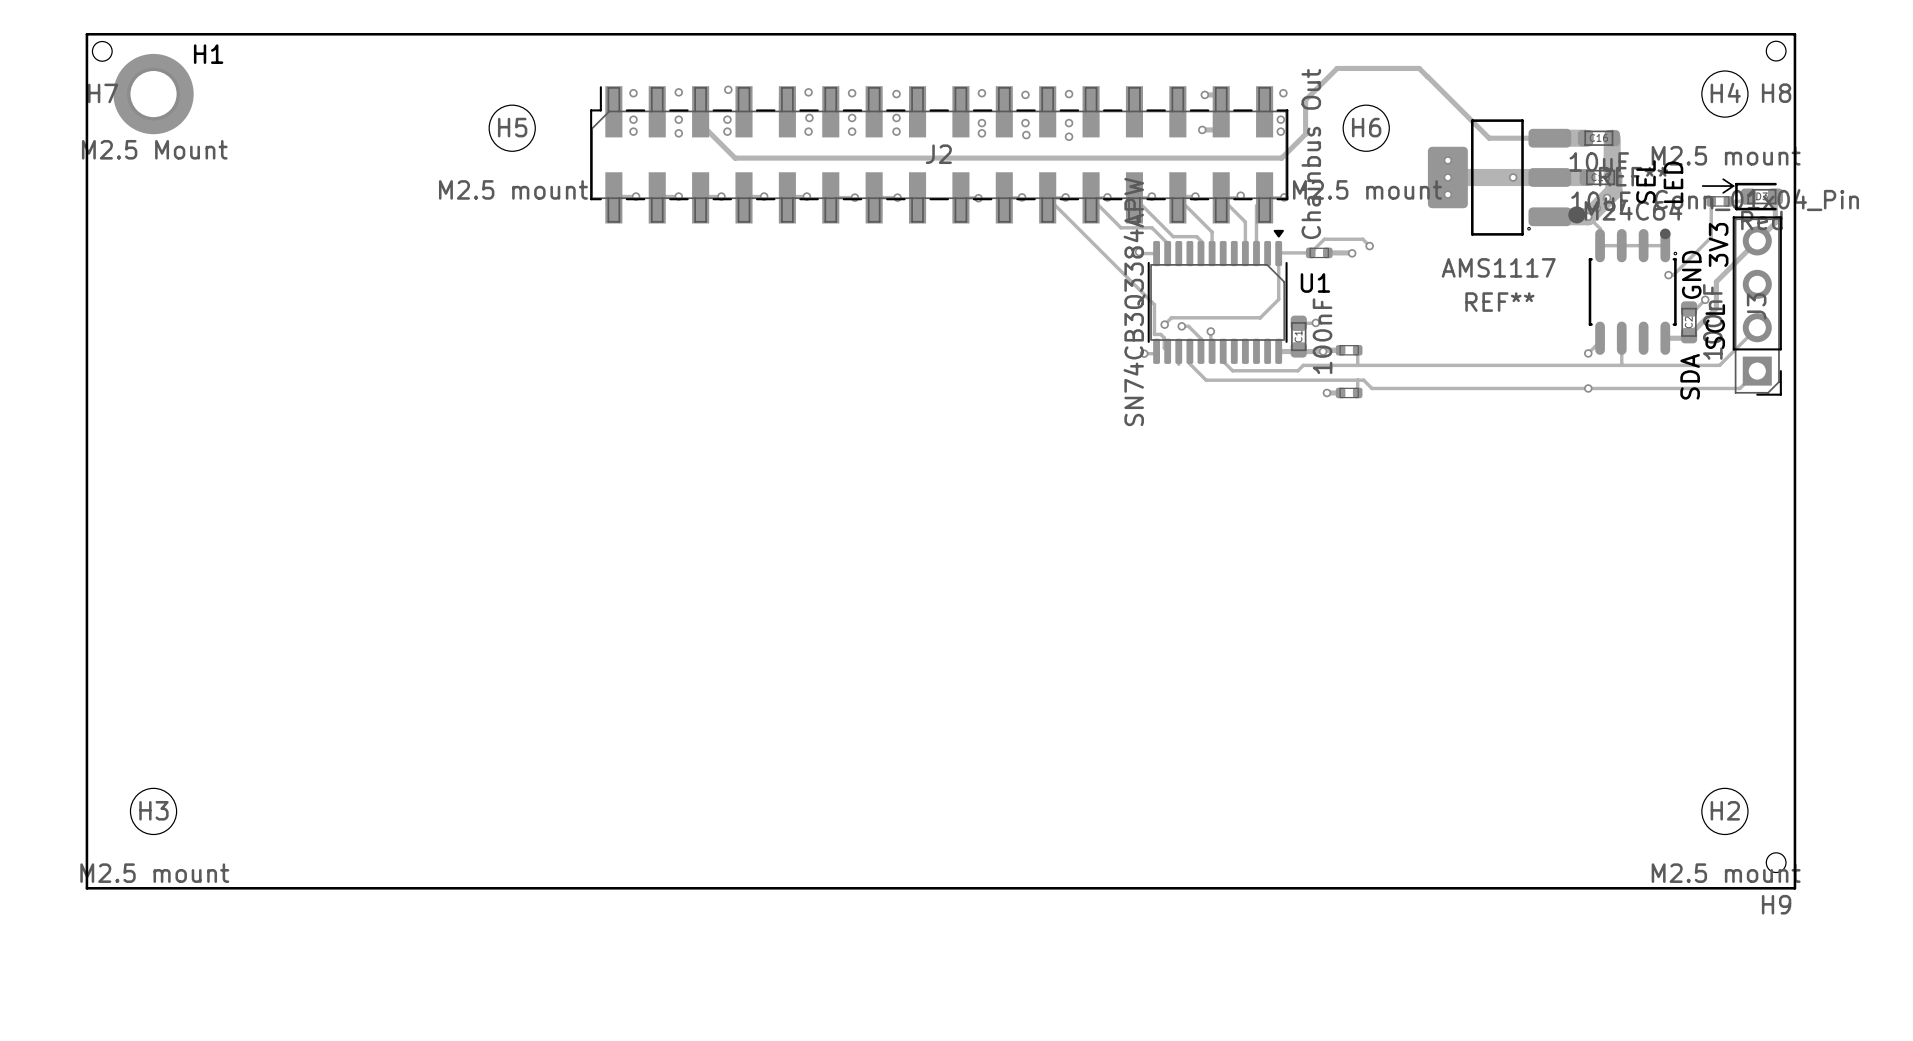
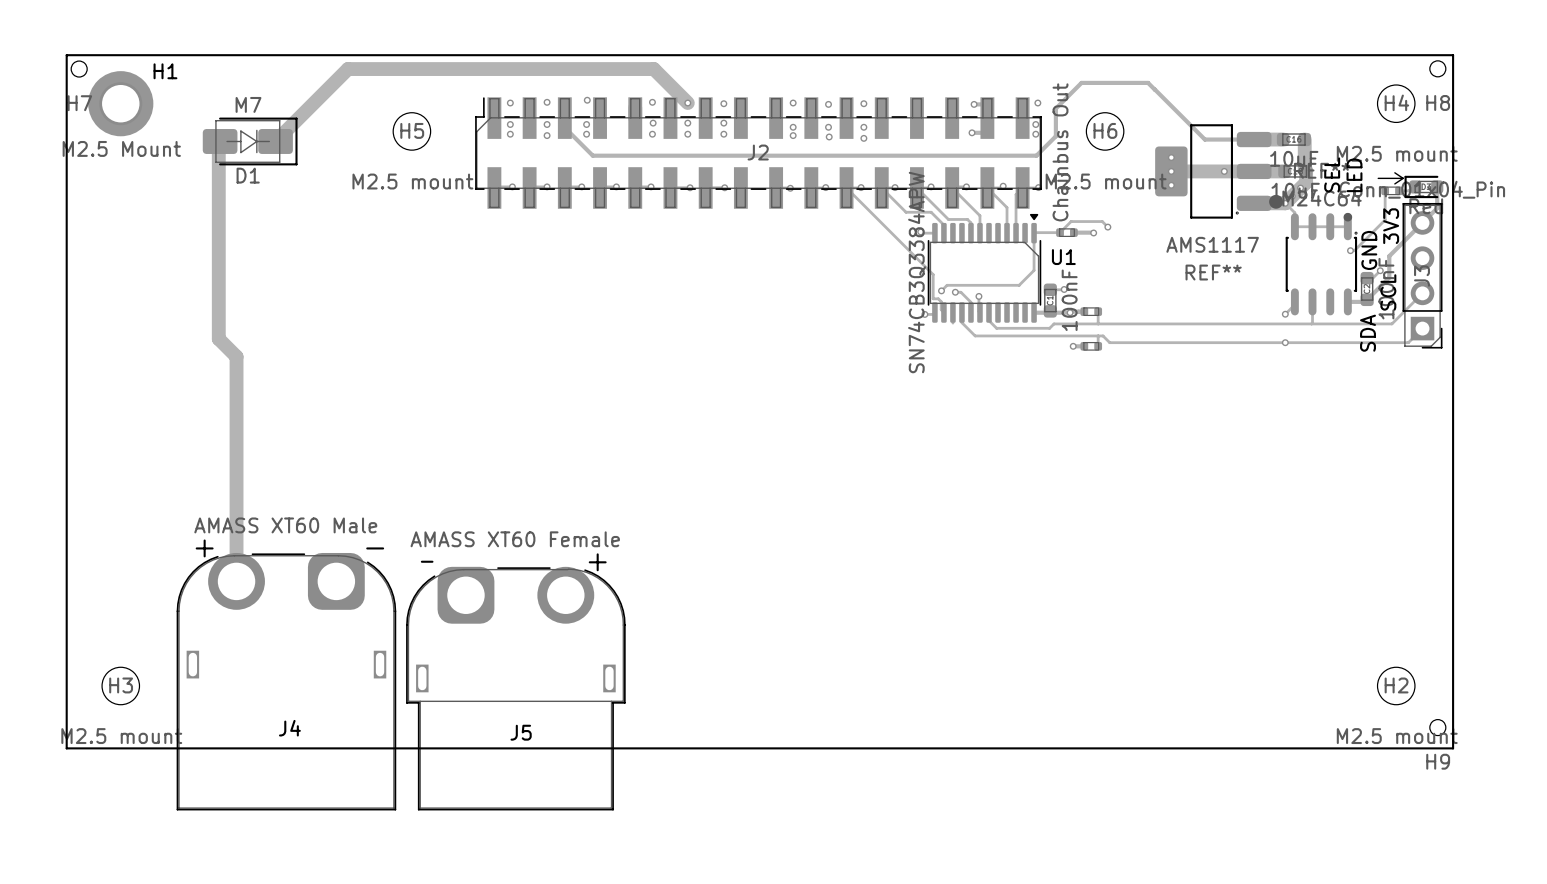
track: none -> (687, 103) (653, 69) (348, 69) (275, 141)
track: none -> (218, 136) (218, 338) (236, 356) (236, 581)
D1: none -> M7 (250, 141)
J4: none -> AMASS XT60 Male (286, 681)
J5: none -> AMASS XT60 Female (515, 688)

